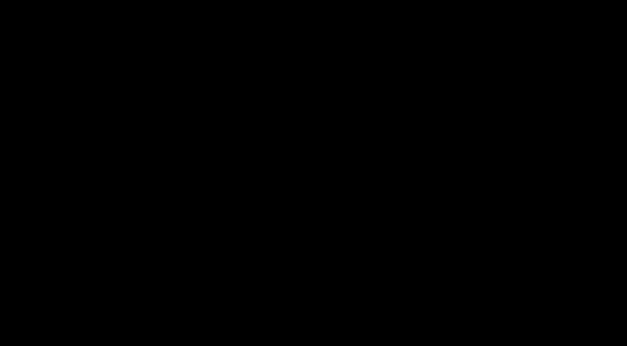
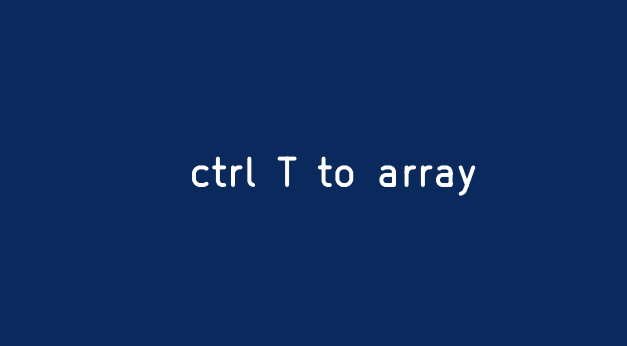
text: none -> ctrl T to array (333, 176)

